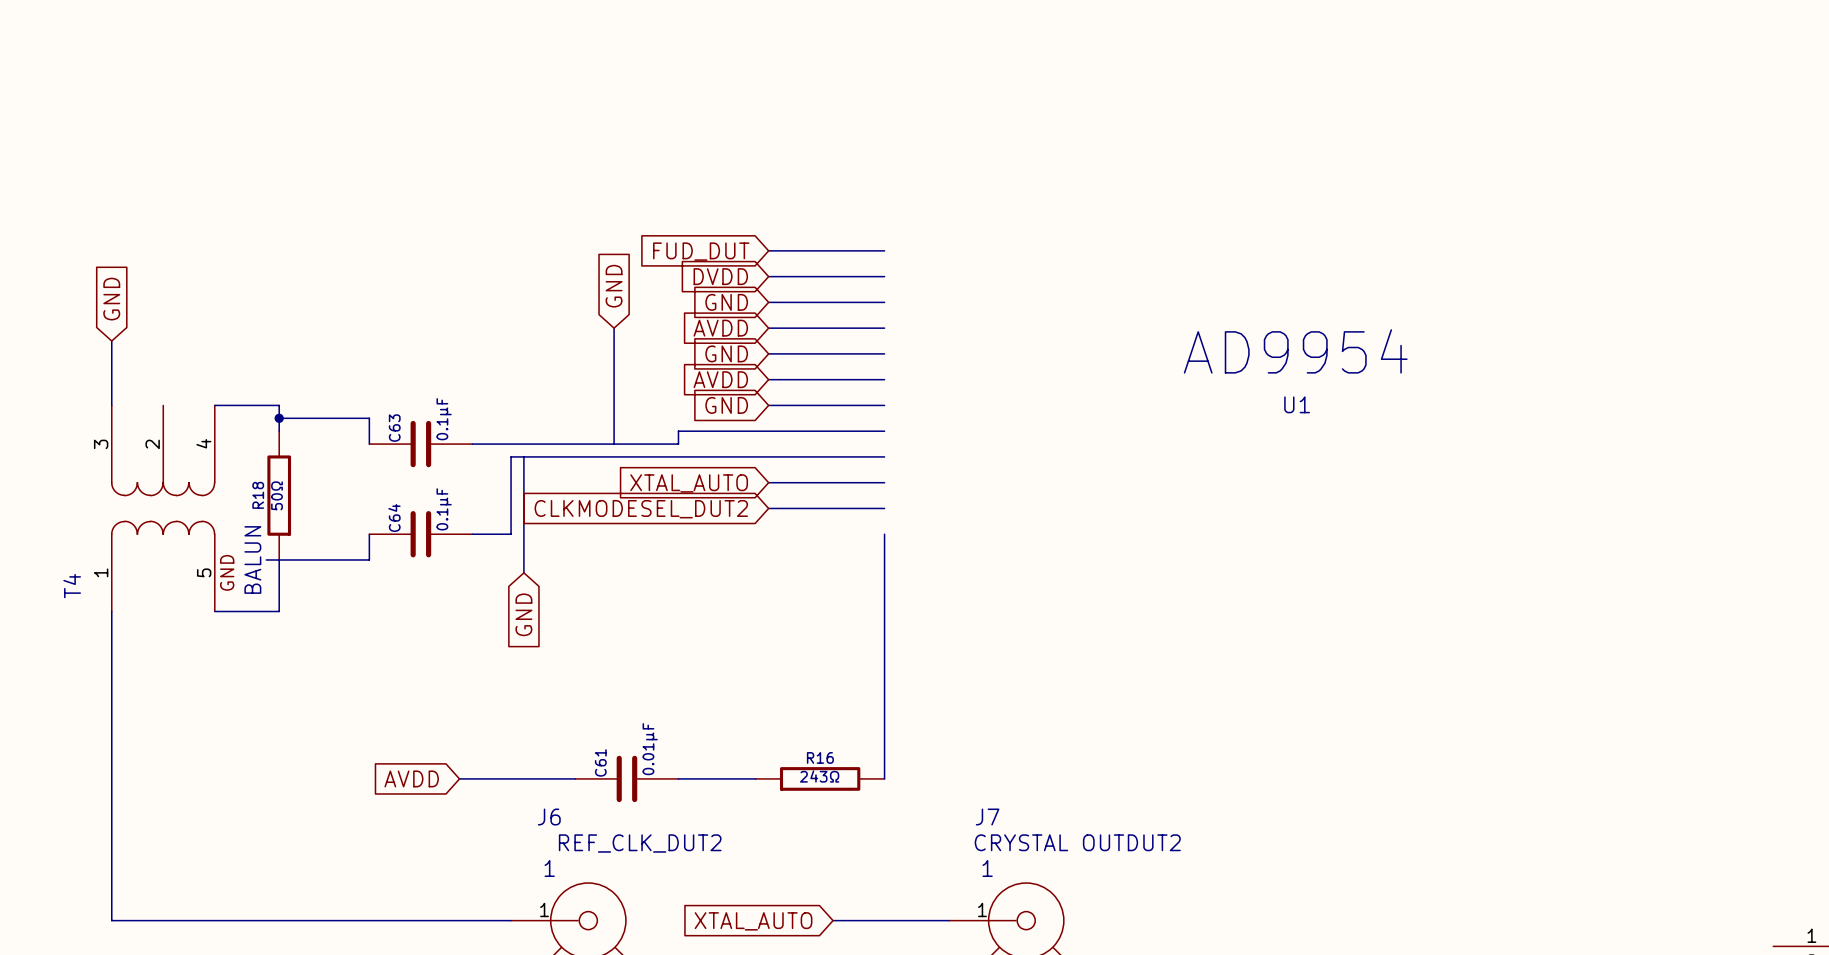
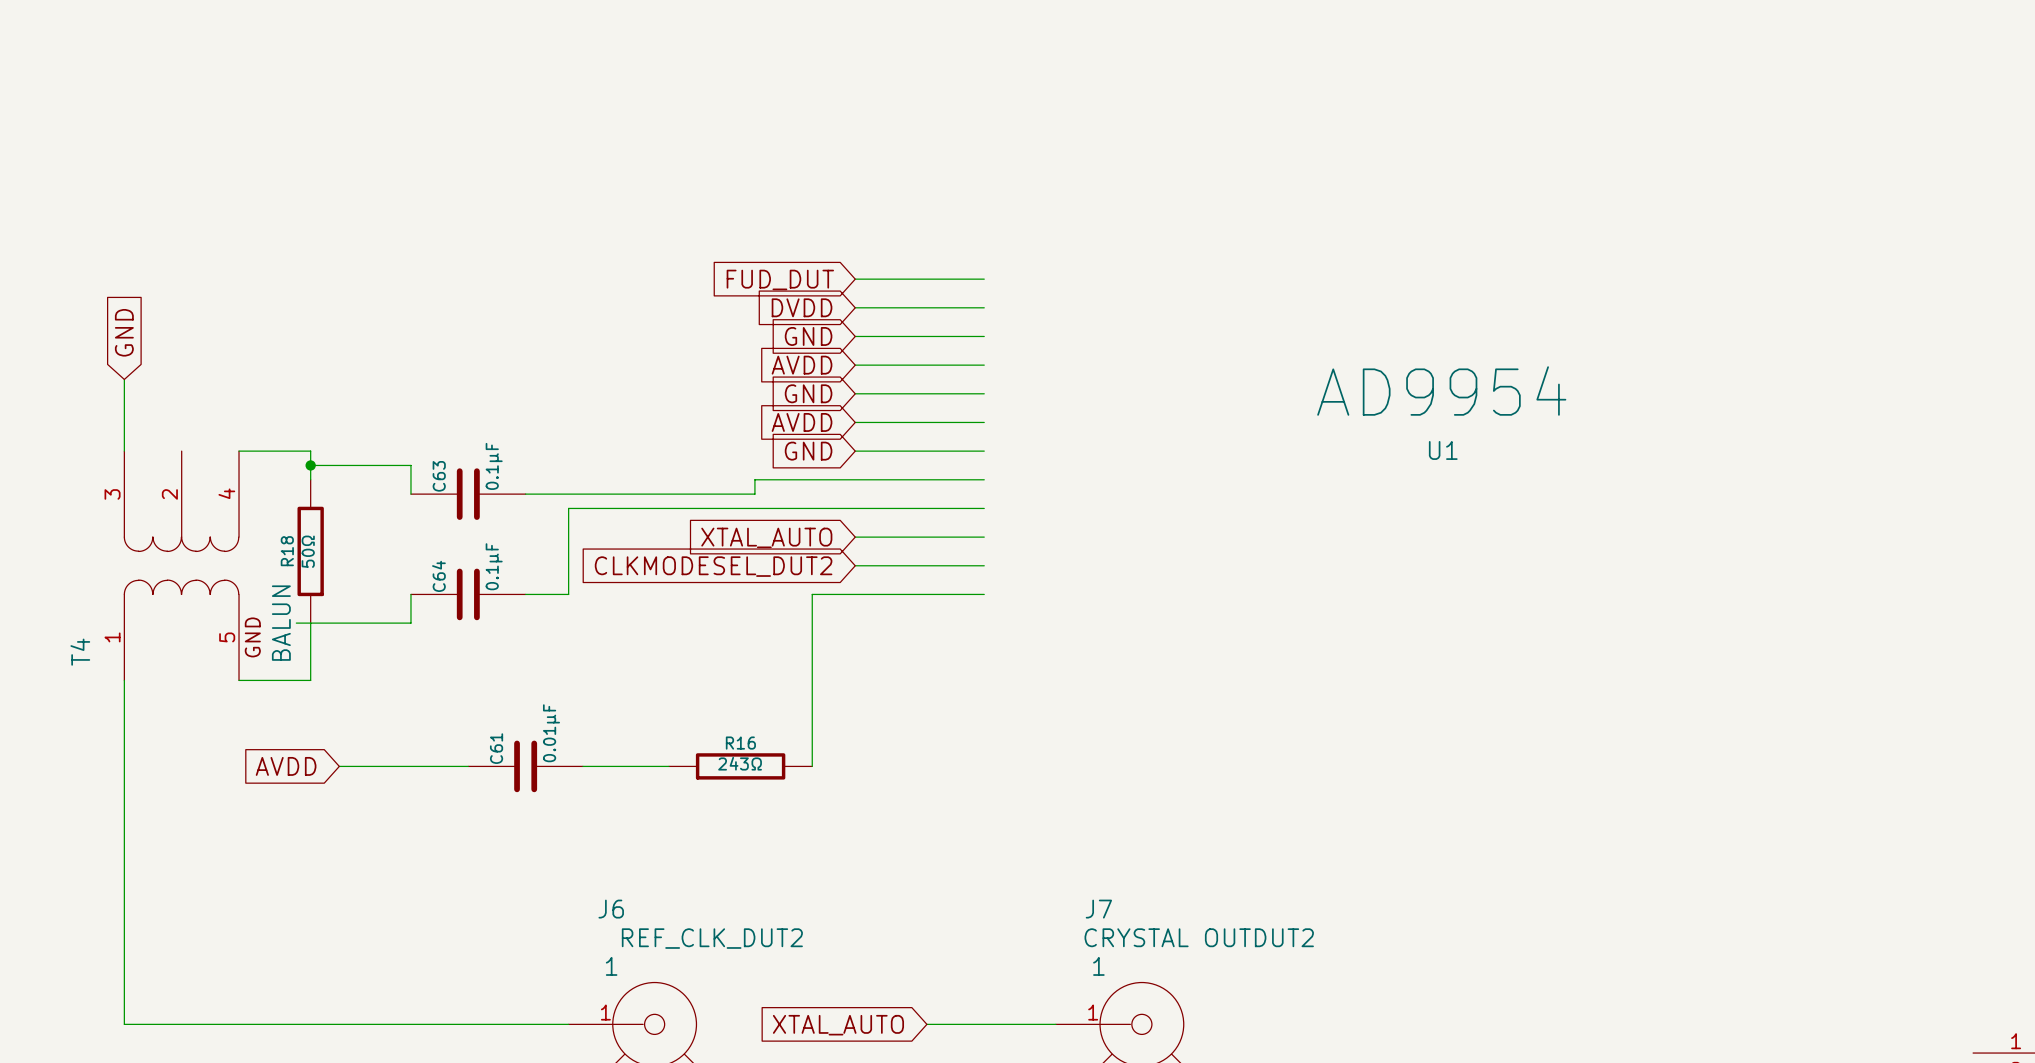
global label: GND (614, 286) -> none
wire: (614, 328) (614, 444) -> none
wire: (523, 456) (523, 572) -> none
wire: (884, 534) (884, 778) -> (984, 594) (812, 594) (812, 766)
global label: GND (523, 614) -> none
global label position: AVDD (411, 778) -> AVDD (286, 766)
wire: (459, 778) (575, 778) -> (339, 766) (468, 766)
C61 position: (626, 778) -> (525, 766)
wire: (678, 778) (755, 778) -> (582, 766) (668, 766)
R16 position: (820, 778) -> (740, 766)

